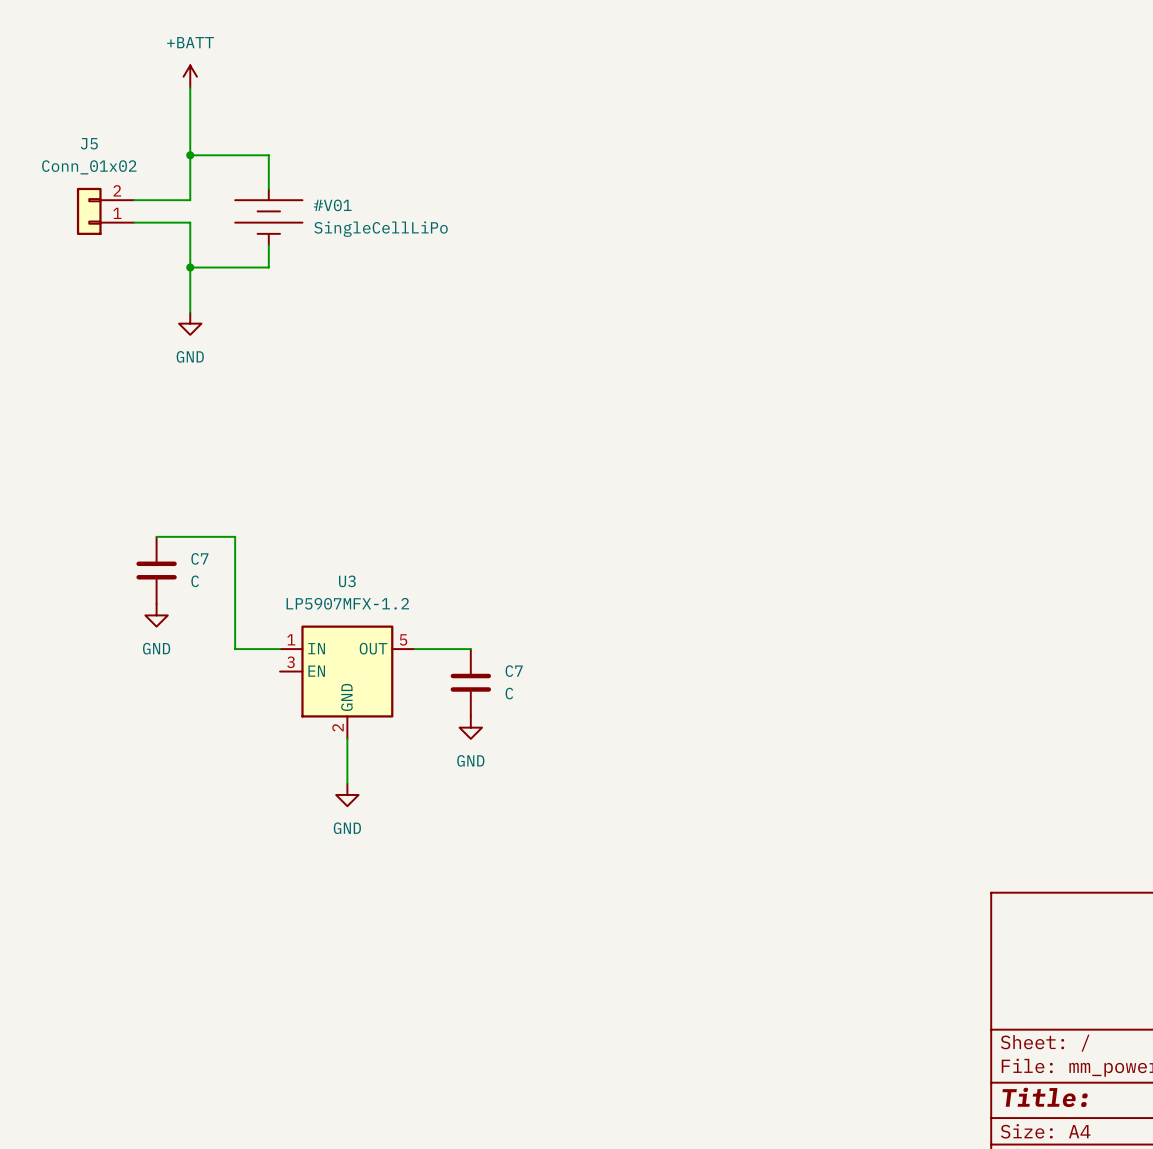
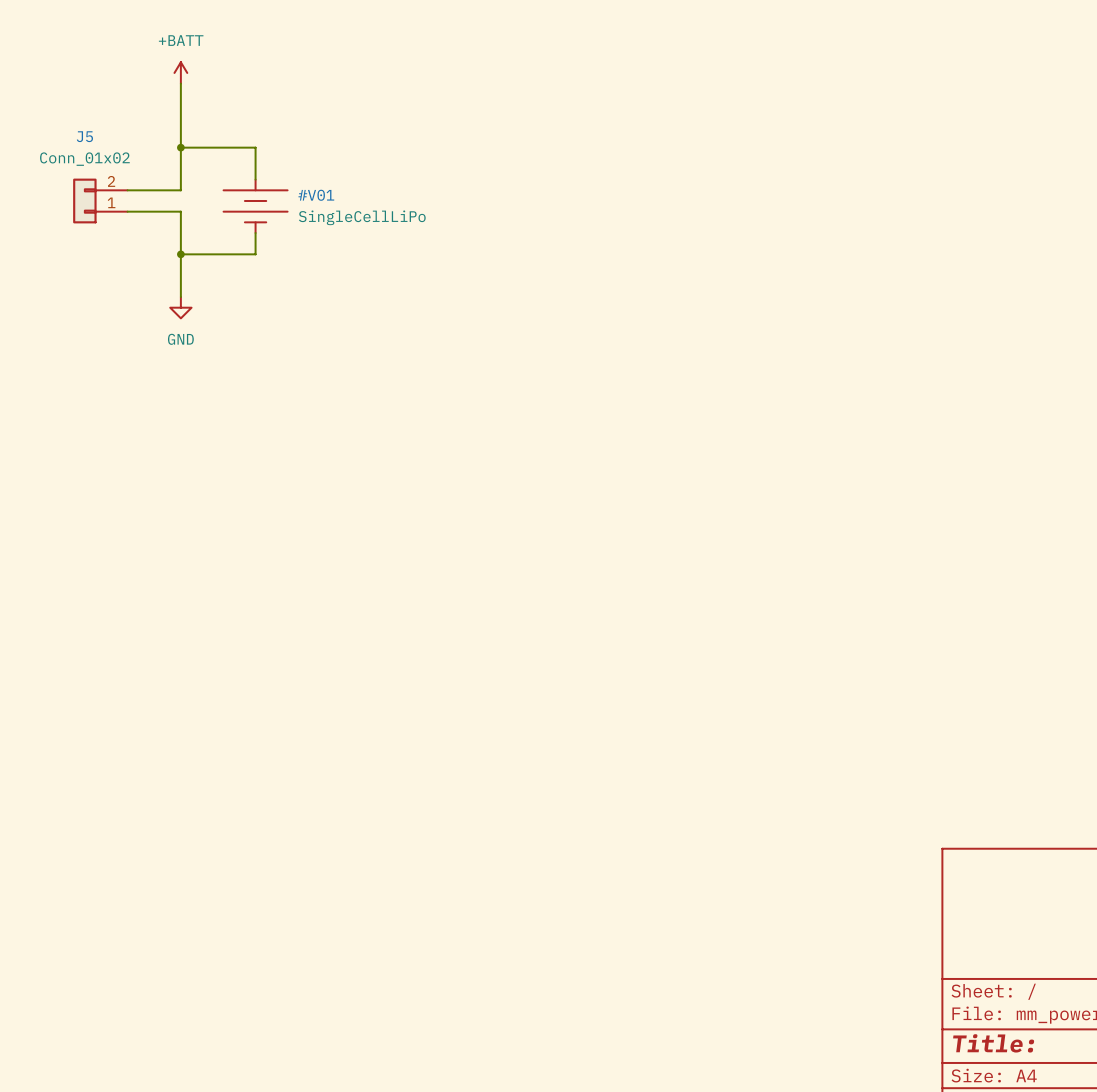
wire: (156, 536) (235, 536) (235, 649) (280, 649) -> none
C7: C (156, 570) -> none
power symbol: GND (156, 615) -> none
wire: (414, 649) (470, 649) -> none
U3: LP5907MFX-1.2 (347, 682) -> none
C7: C (470, 682) -> none
power symbol: GND (470, 727) -> none
wire: (347, 738) (347, 783) -> none
power symbol: GND (347, 794) -> none

